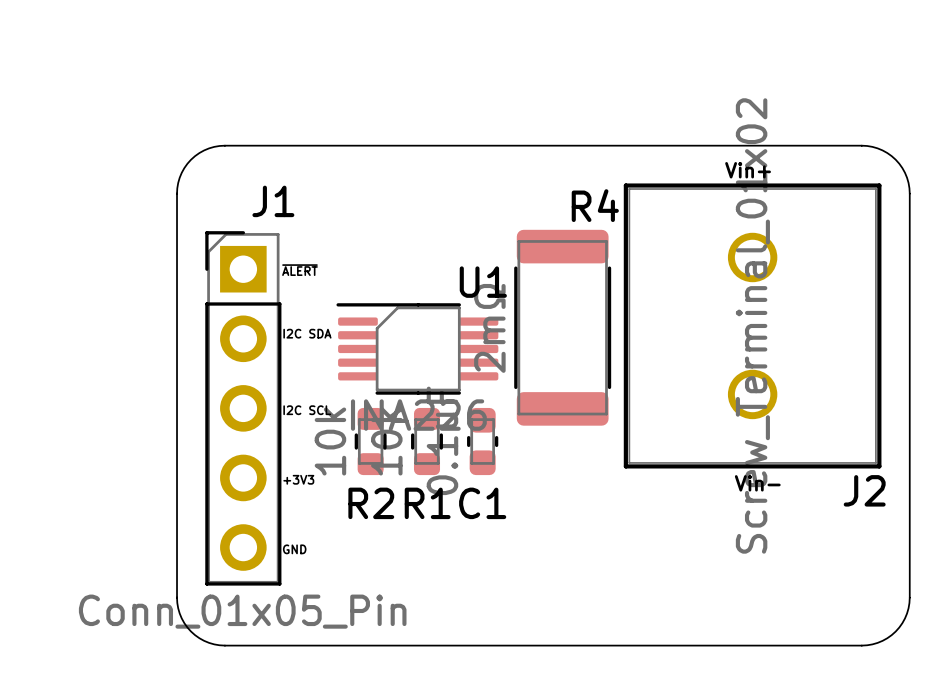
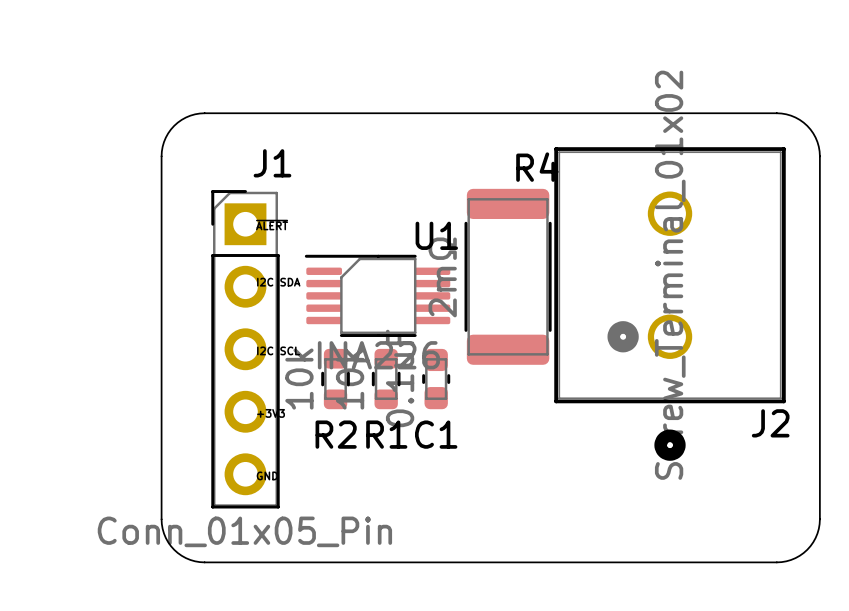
text: Vin+ (748, 170) -> none
J2 footprint: [623, 183, 882, 469] -> [554, 147, 786, 461]
J1 position: (243, 408) -> (245, 349)
text: Vin- (757, 483) -> none

